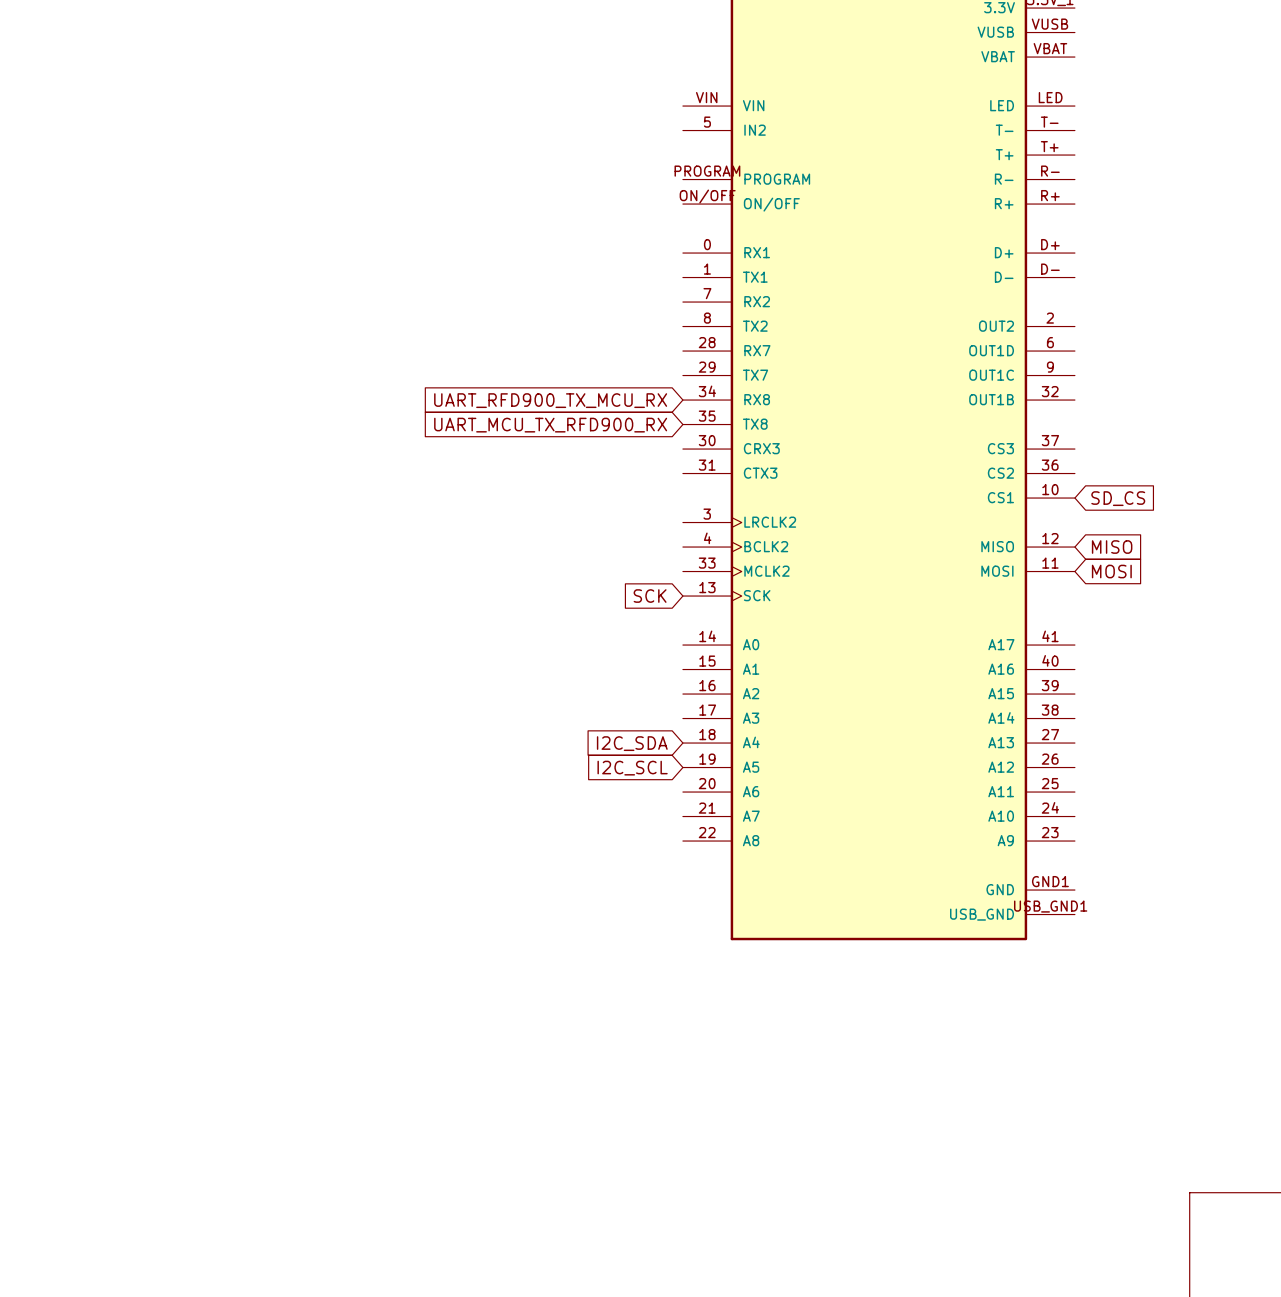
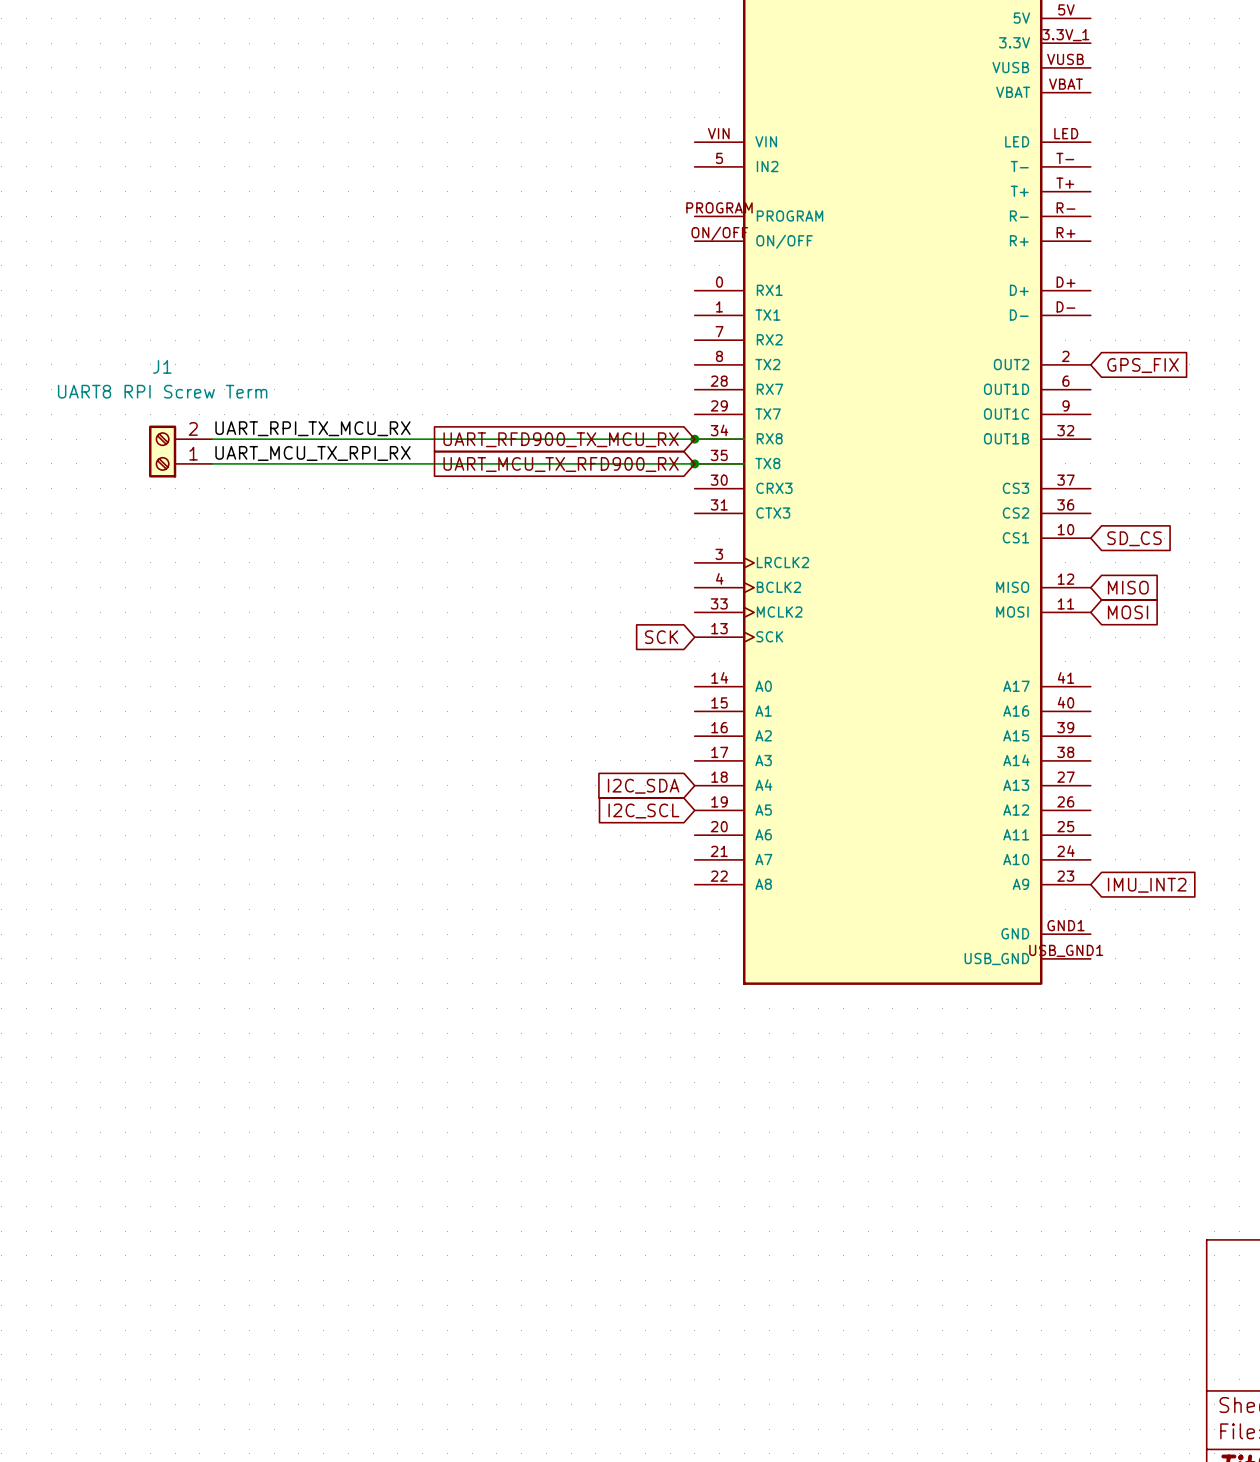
global label: none -> GPS_FIX (1143, 365)
label: none -> UART_RPI_TX_MCU_RX (312, 428)
wire: none -> (212, 439) (744, 439)
junction: none -> (694, 439)
J1: none -> UART8 RPI Screw Term (180, 451)
label: none -> UART_MCU_TX_RPI_RX (312, 453)
wire: none -> (212, 463) (744, 463)
junction: none -> (694, 463)
global label: none -> IMU_INT2 (1147, 885)

